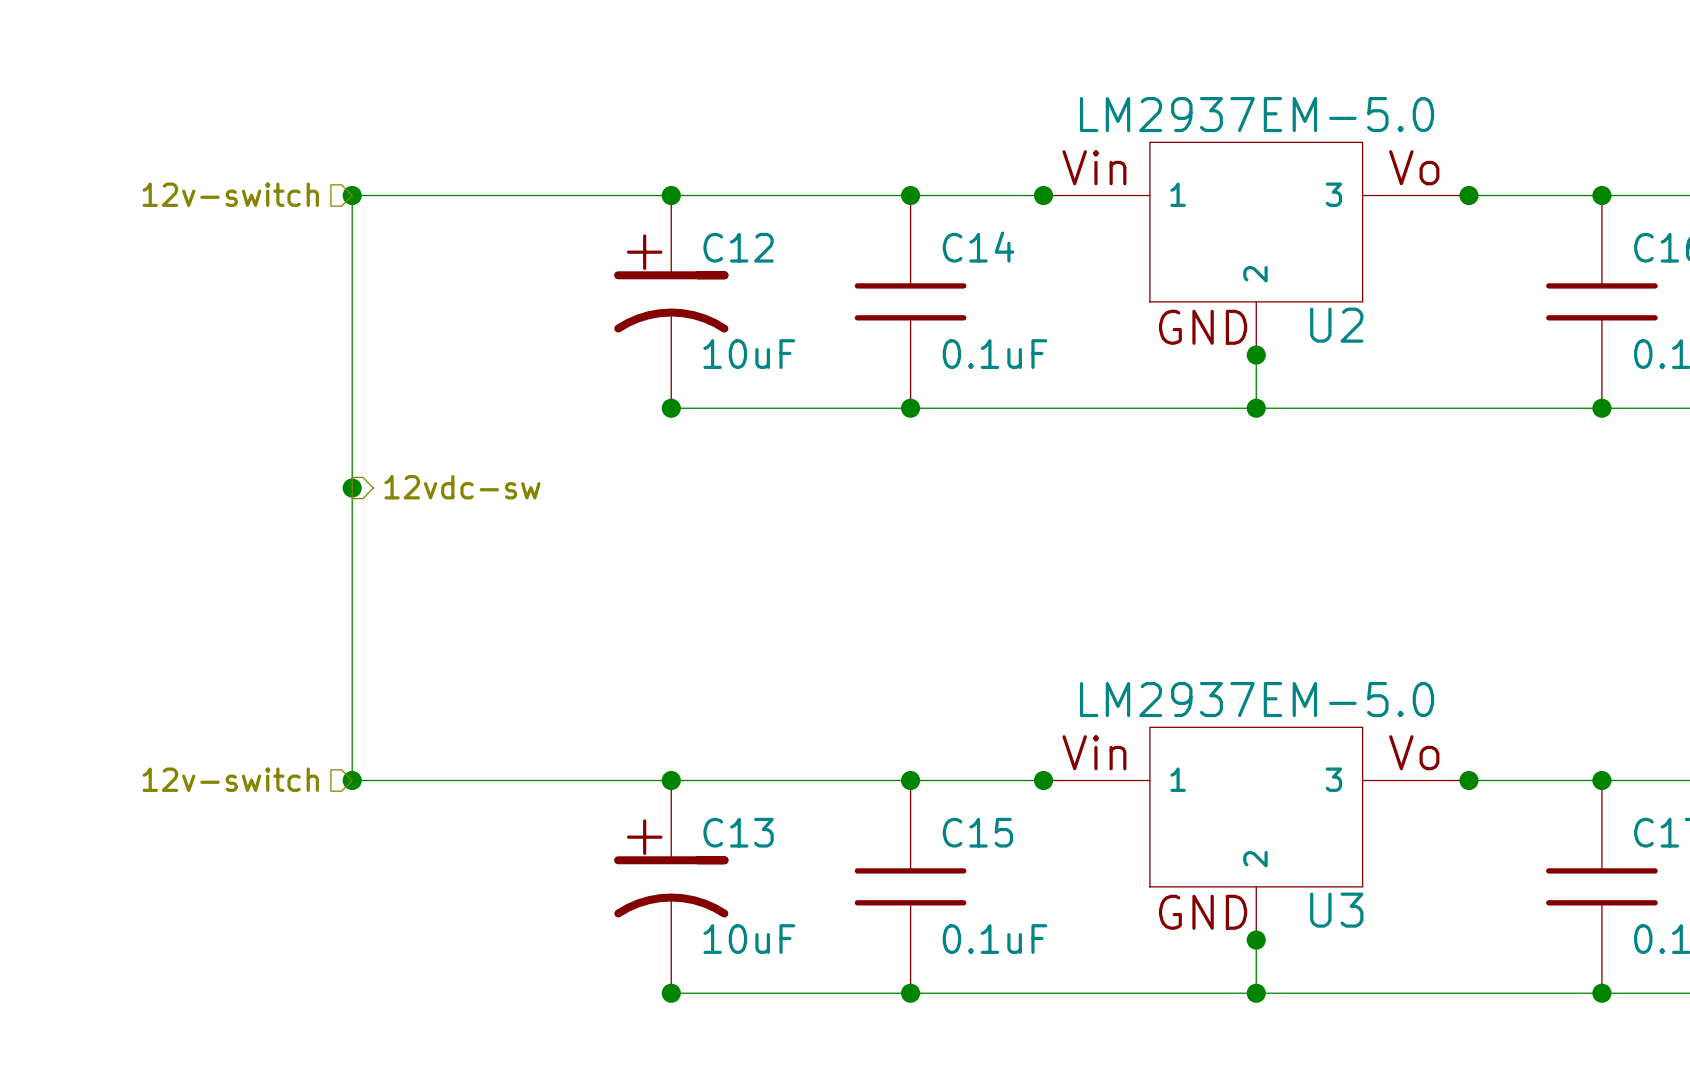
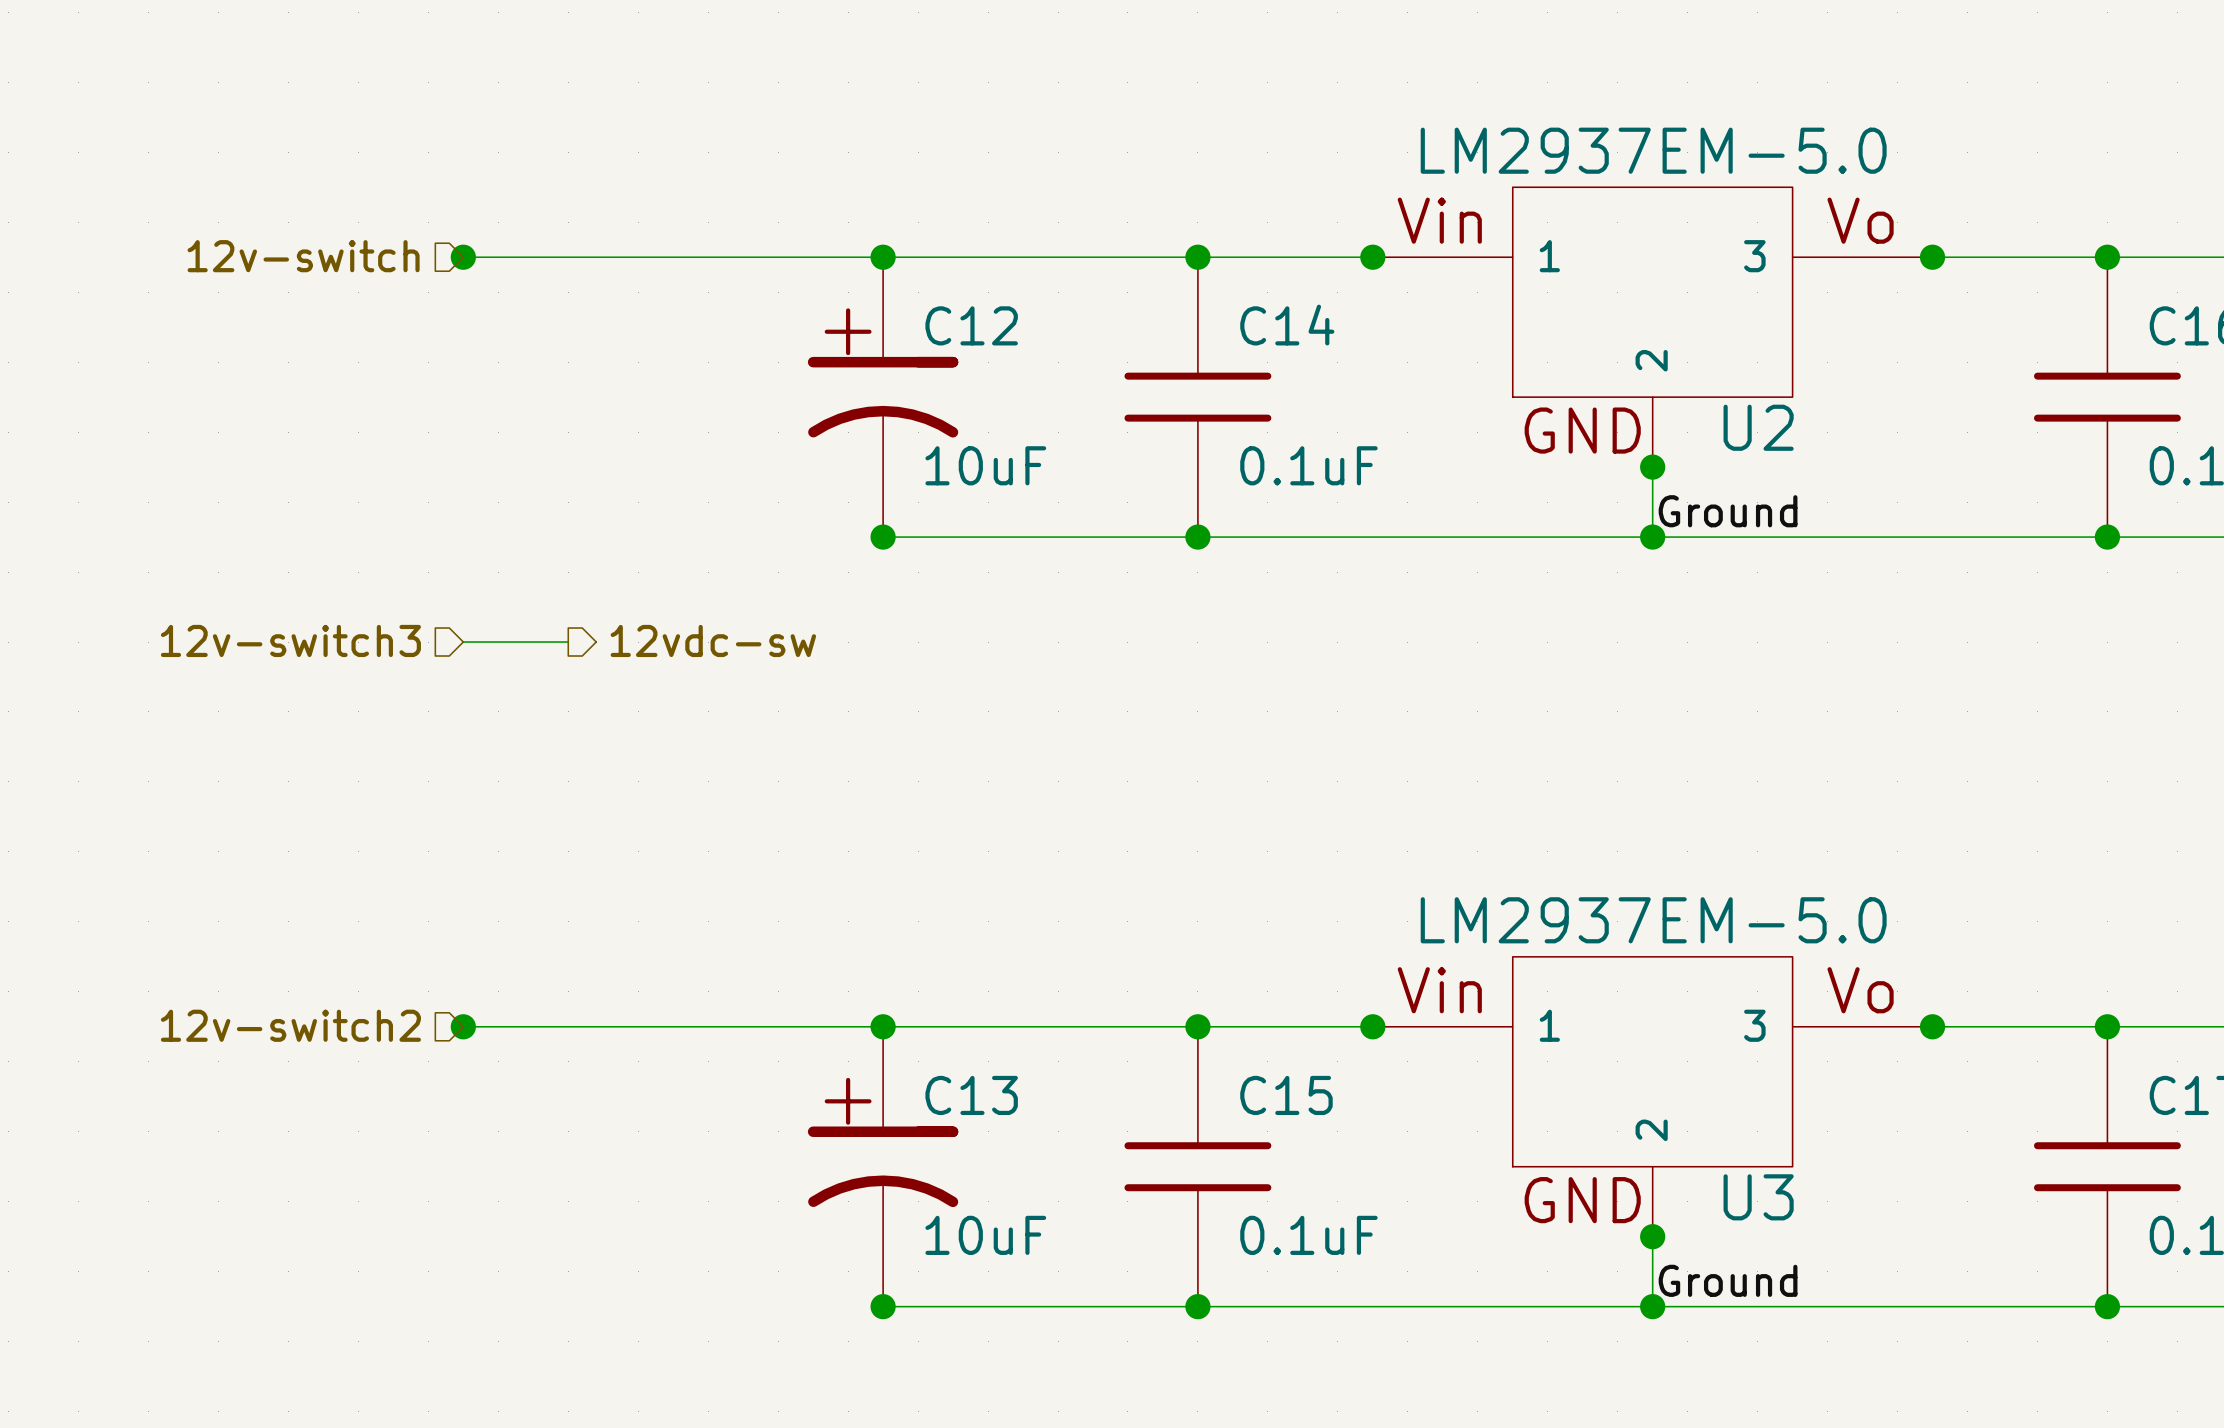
wire: (352, 195) (352, 780) -> none
label: none -> Ground (1728, 511)
hierarchical label: none -> 12v-switch3 (290, 640)
hierarchical label position: 12vdc-sw (462, 487) -> 12vdc-sw (713, 640)
wire: none -> (463, 642) (568, 642)
junction: (352, 488) -> none
hierarchical label: 12v-switch (230, 779) -> 12v-switch2 (290, 1025)
label: none -> Ground (1728, 1280)

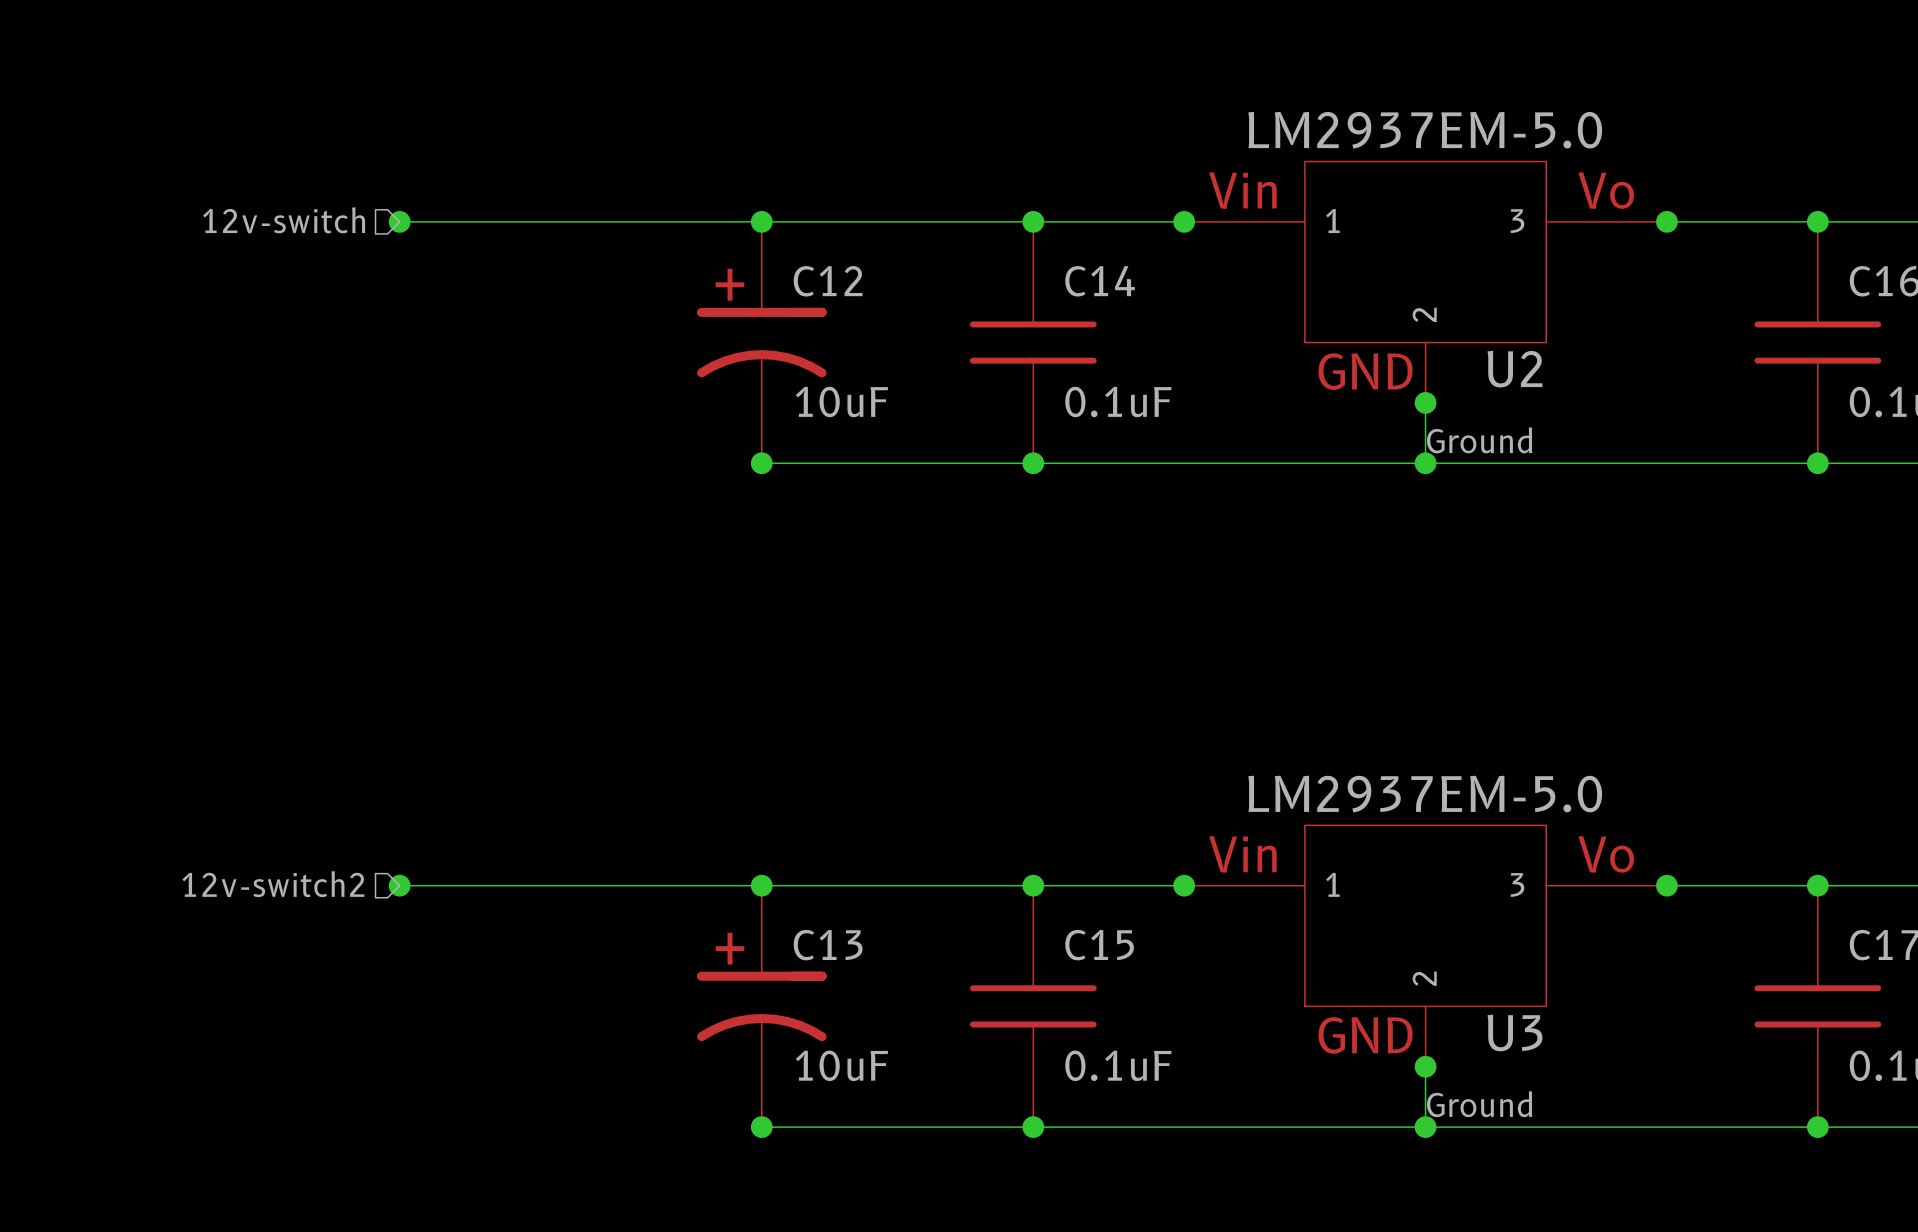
hierarchical label: 12v-switch3 (290, 640) -> none
hierarchical label: 12vdc-sw (713, 640) -> none
wire: (463, 642) (568, 642) -> none

